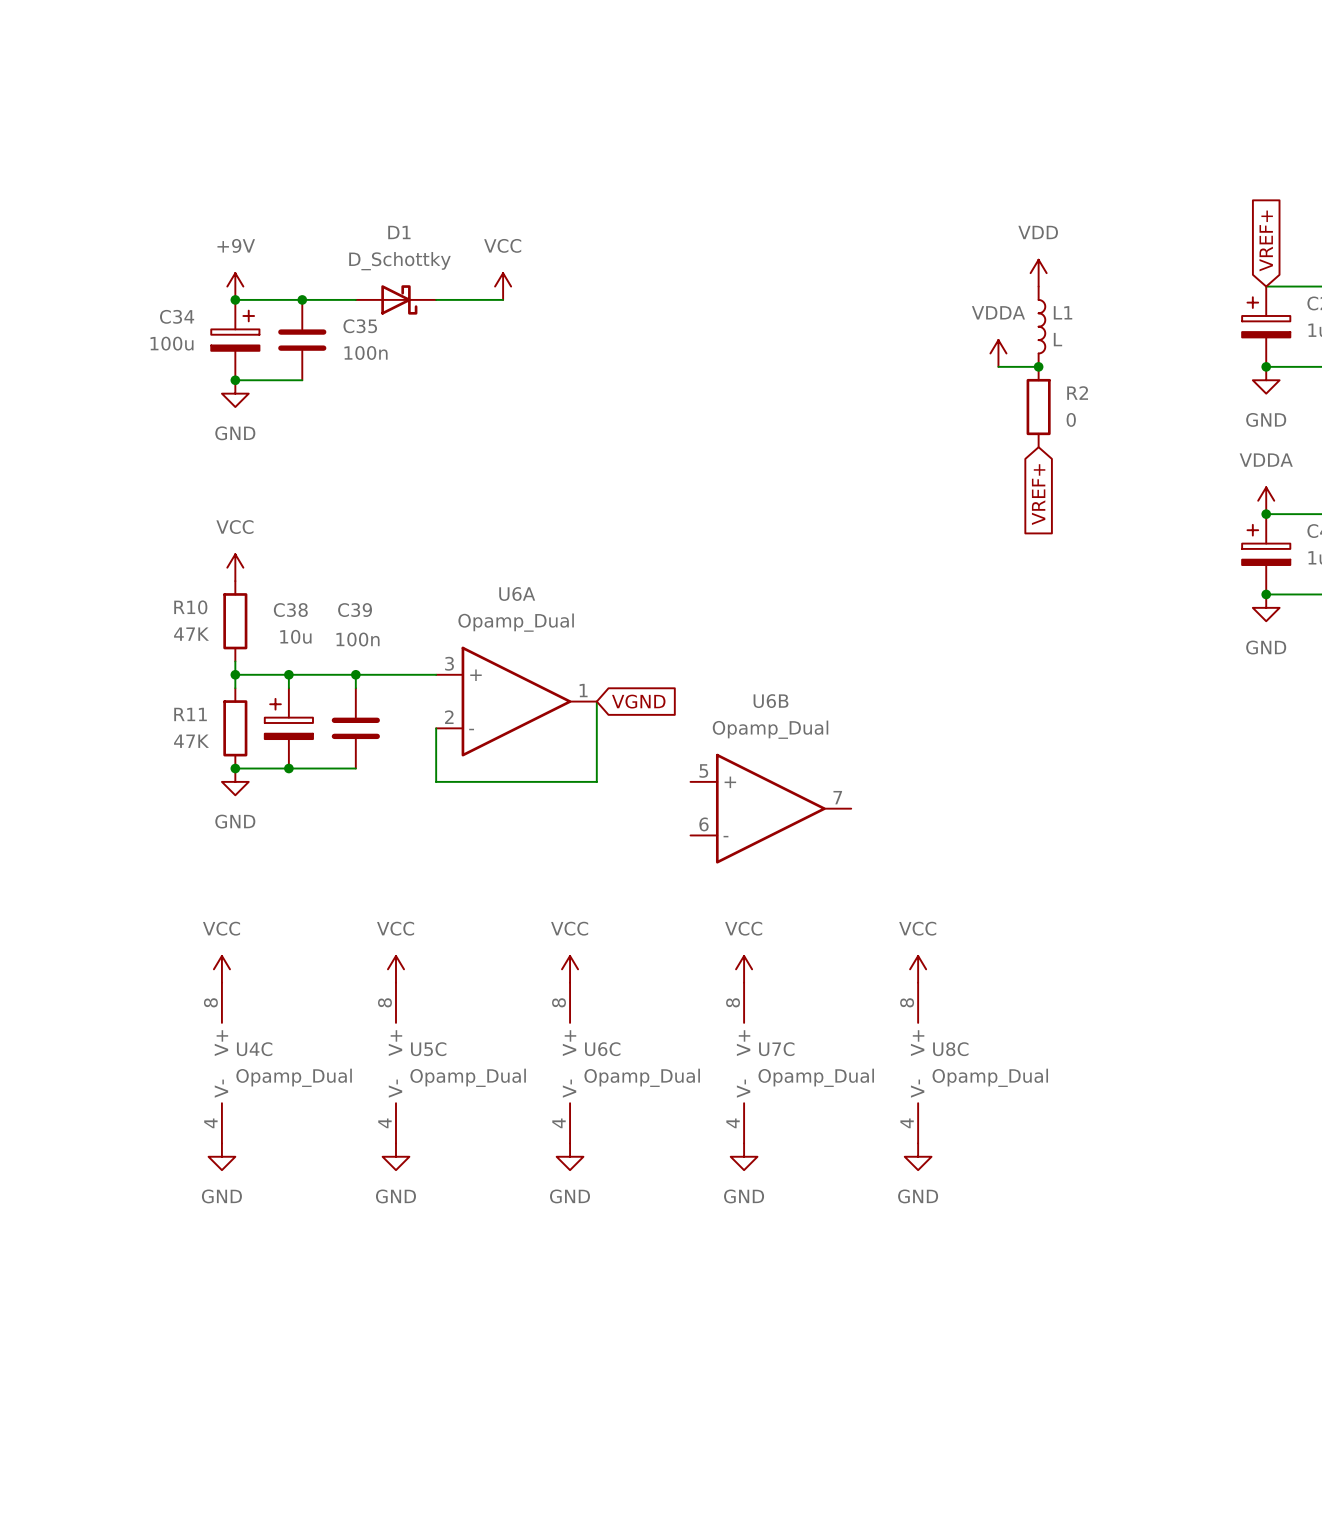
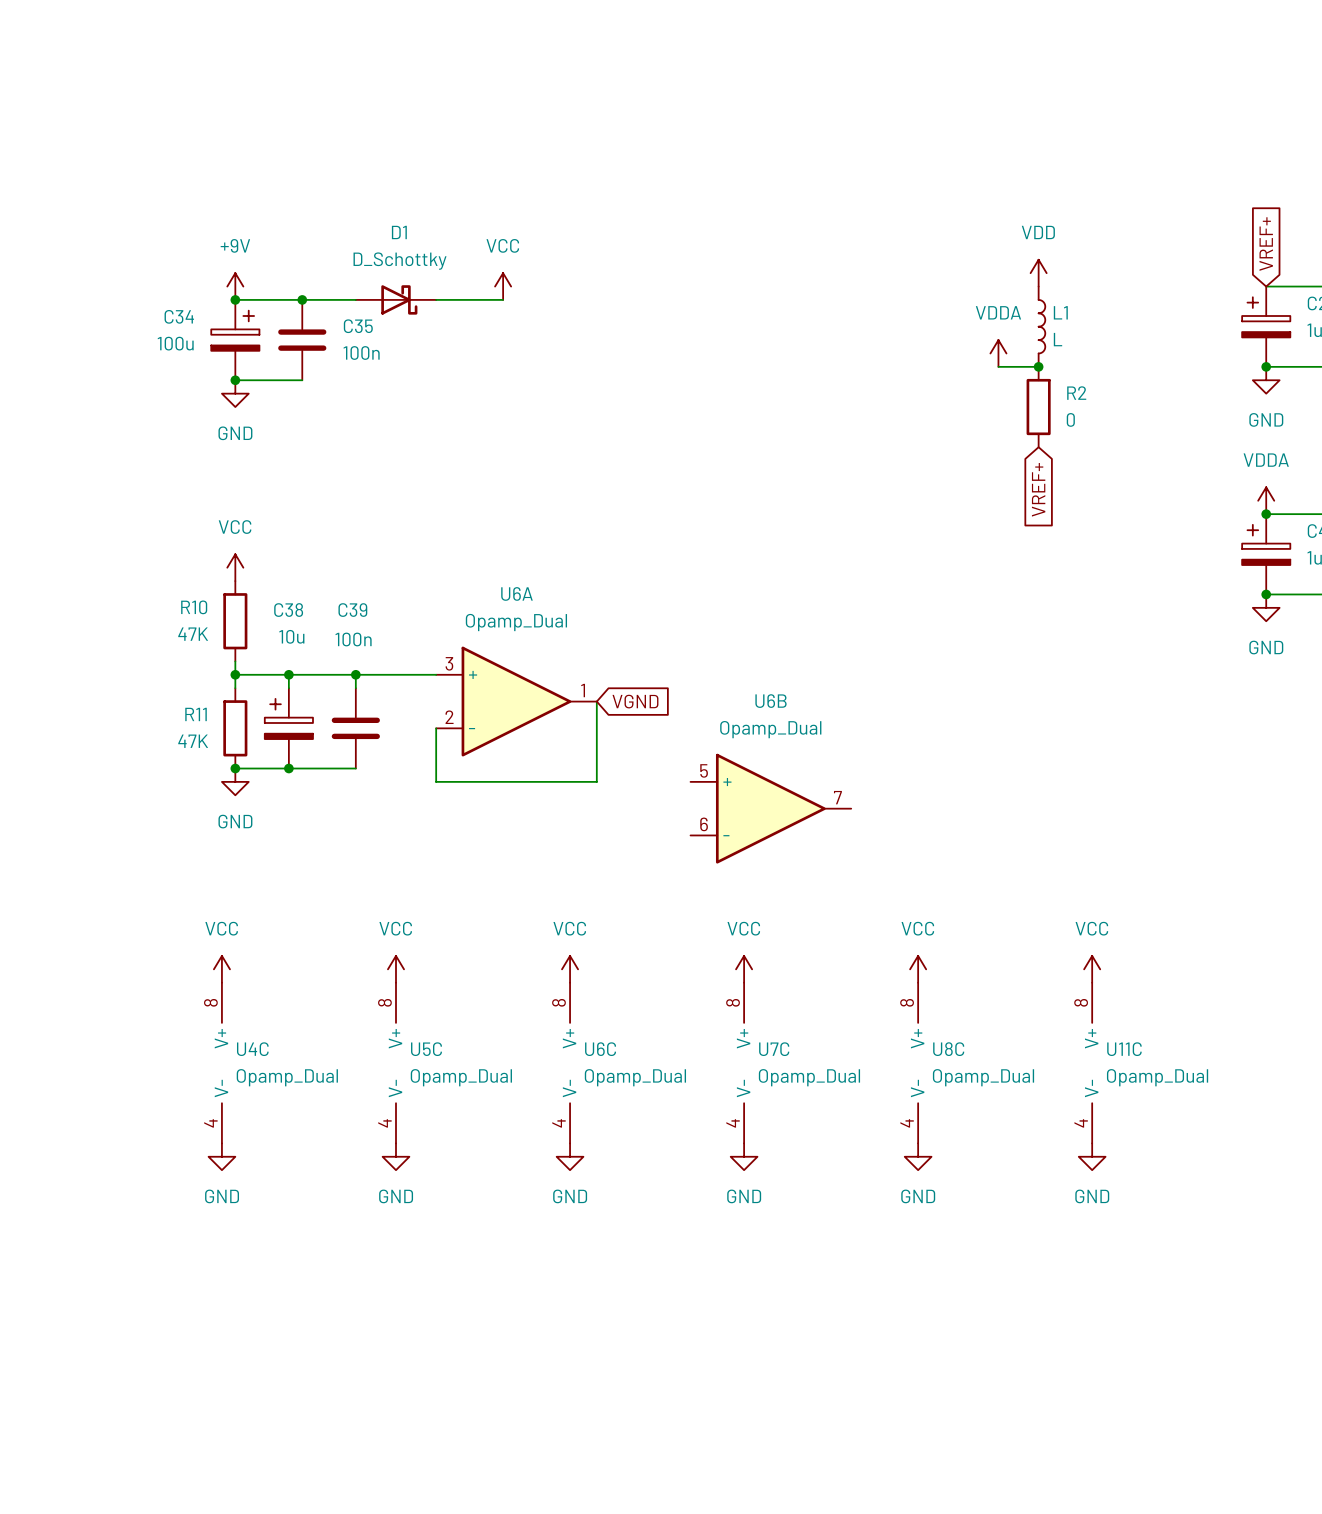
power symbol: none -> VCC (1092, 969)
U11C: none -> Opamp_Dual (1092, 1063)
power symbol: none -> GND (1092, 1156)

